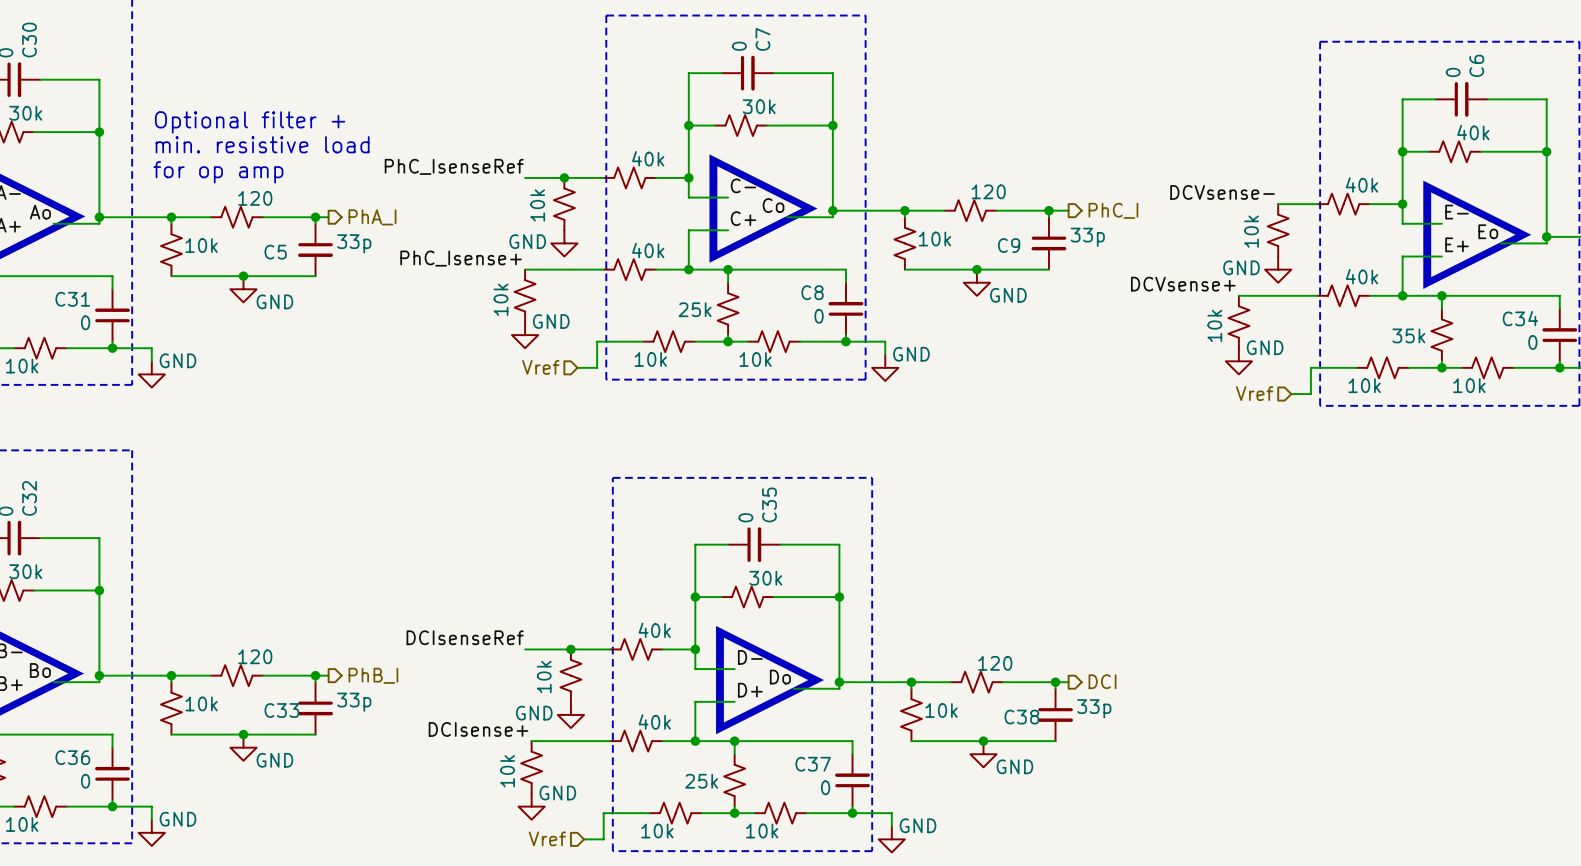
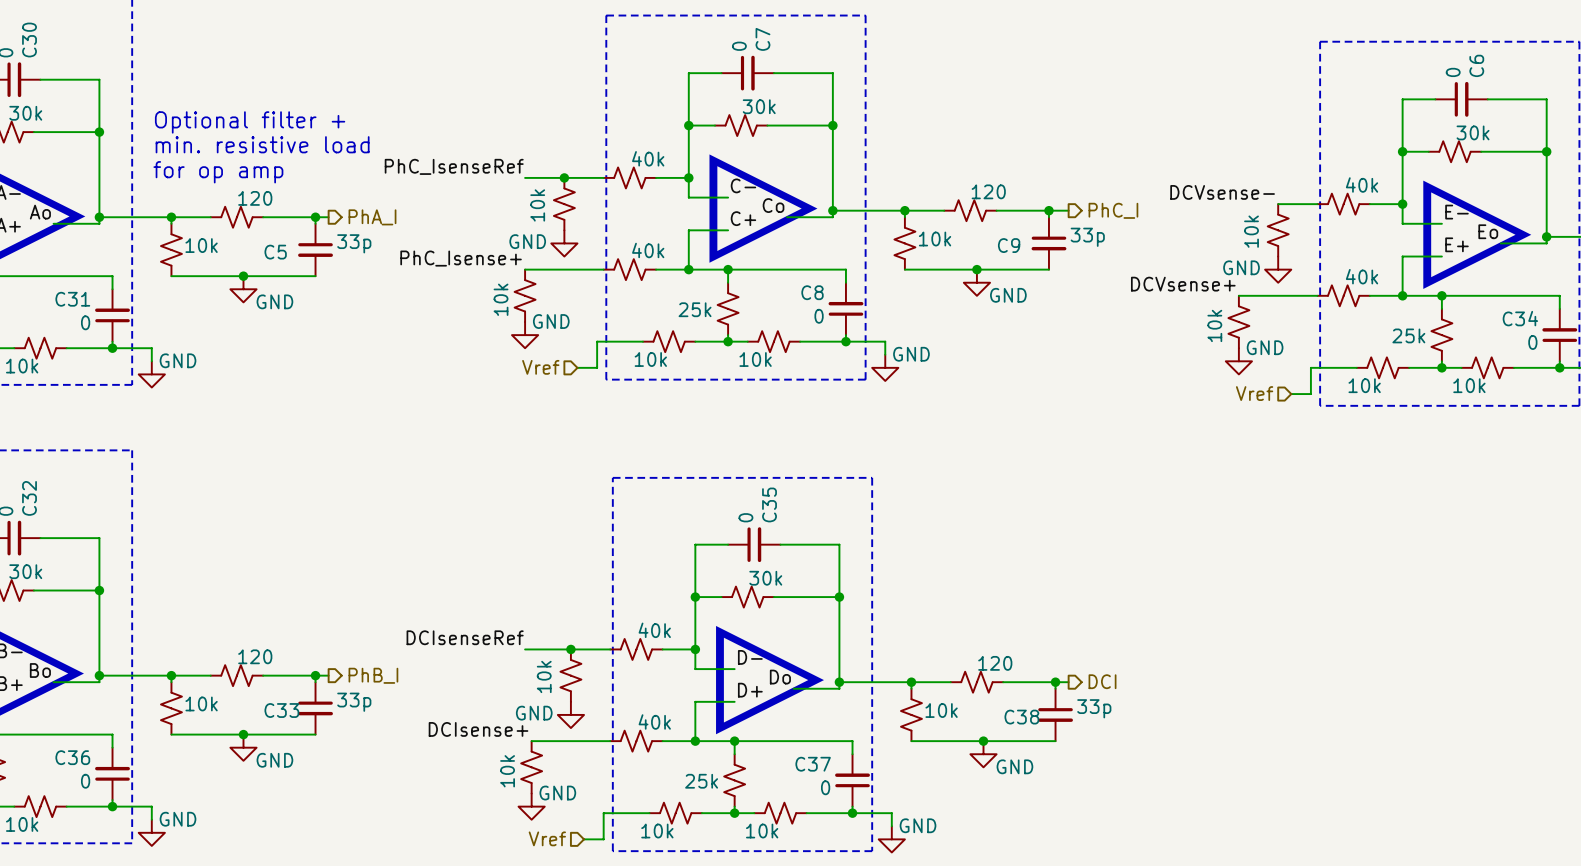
part value: 40k (1473, 132) -> 30k (1473, 132)
part value: 35k (1408, 335) -> 25k (1408, 335)

